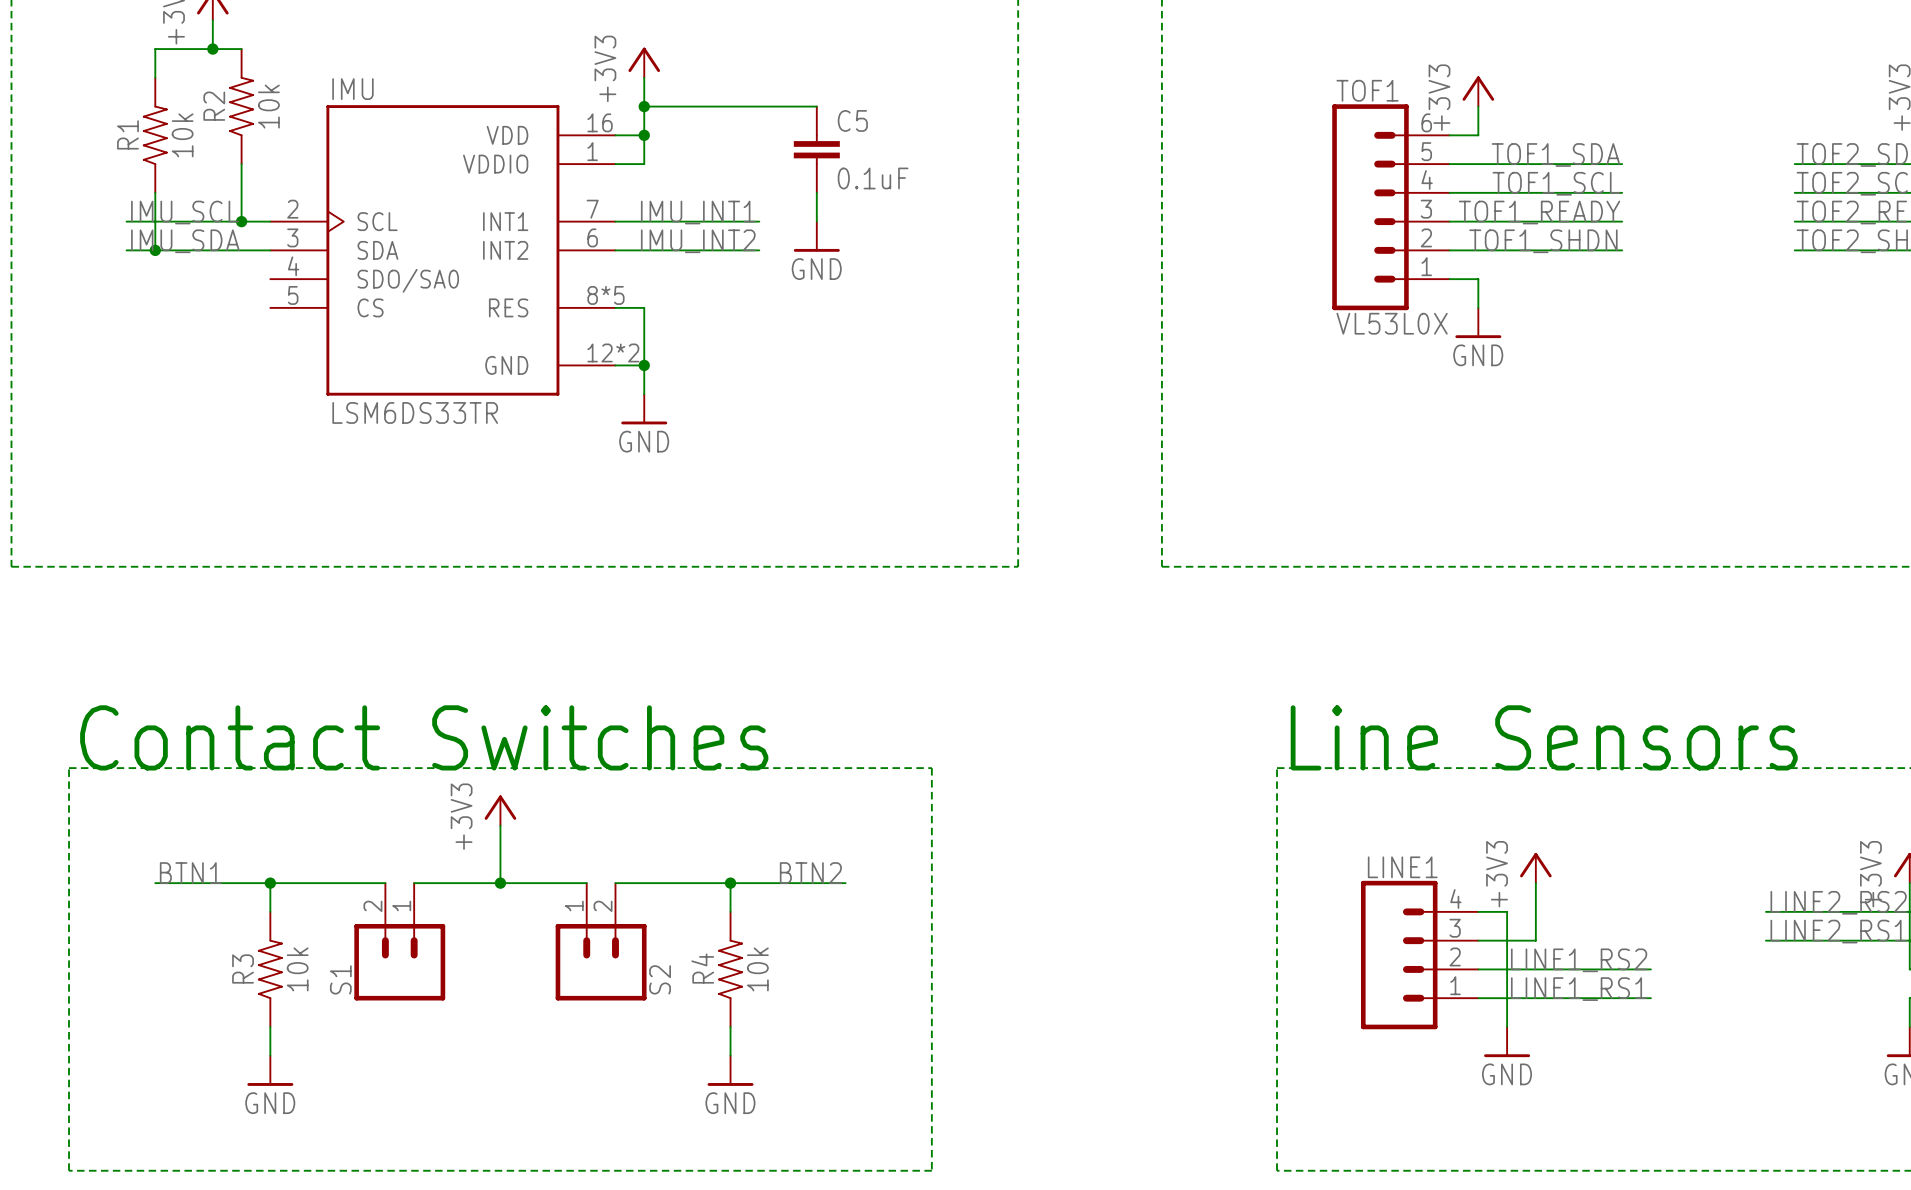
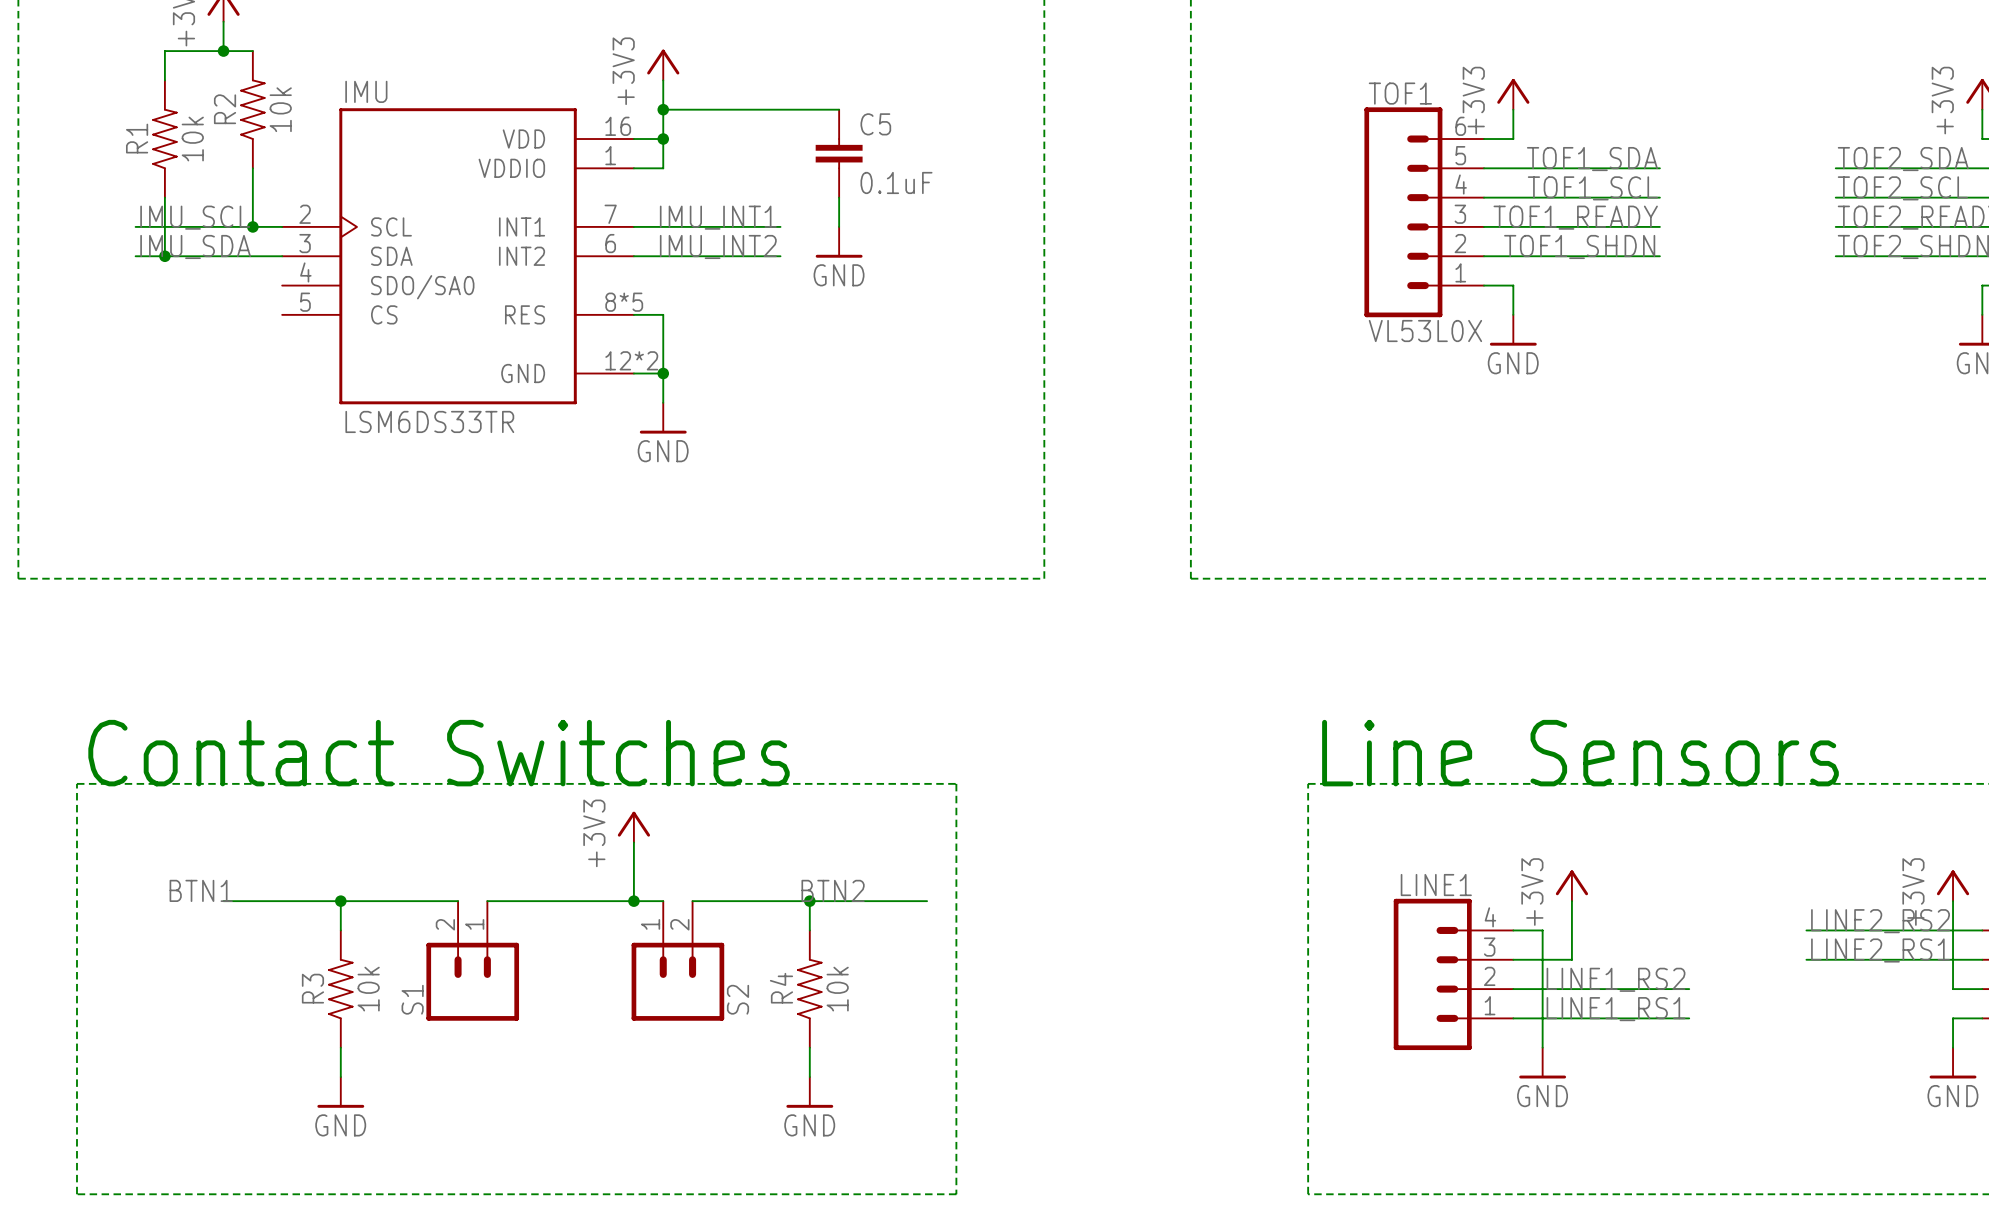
power symbol position: +3V3 (500, 810) -> +3V3 (633, 827)
wire: (500, 825) (500, 883) -> none
wire: none -> (633, 842) (633, 901) (604, 901)
wire: (155, 883) (212, 883) -> none
wire: (270, 883) (270, 911) -> (340, 901) (340, 930)
junction position: (270, 883) -> (340, 901)
wire: (442, 883) (471, 883) -> (399, 901) (428, 901)
junction: (500, 883) -> none
junction: none -> (633, 901)
wire: (644, 883) (673, 883) -> none
wire: (730, 883) (730, 911) -> (809, 901) (809, 930)
junction: (730, 883) -> none
junction: none -> (809, 901)
wire: none -> (868, 901) (927, 901)
S1 position: (399, 941) -> (472, 960)
S2 position: (601, 941) -> (677, 960)
R3 position: (270, 969) -> (340, 989)
R4 position: (730, 969) -> (809, 989)
wire: (270, 1026) (270, 1055) -> (340, 1047) (340, 1077)
wire: (730, 1026) (730, 1055) -> (809, 1047) (809, 1077)
power symbol position: GND (270, 1070) -> GND (340, 1092)
power symbol position: GND (730, 1070) -> GND (809, 1092)

